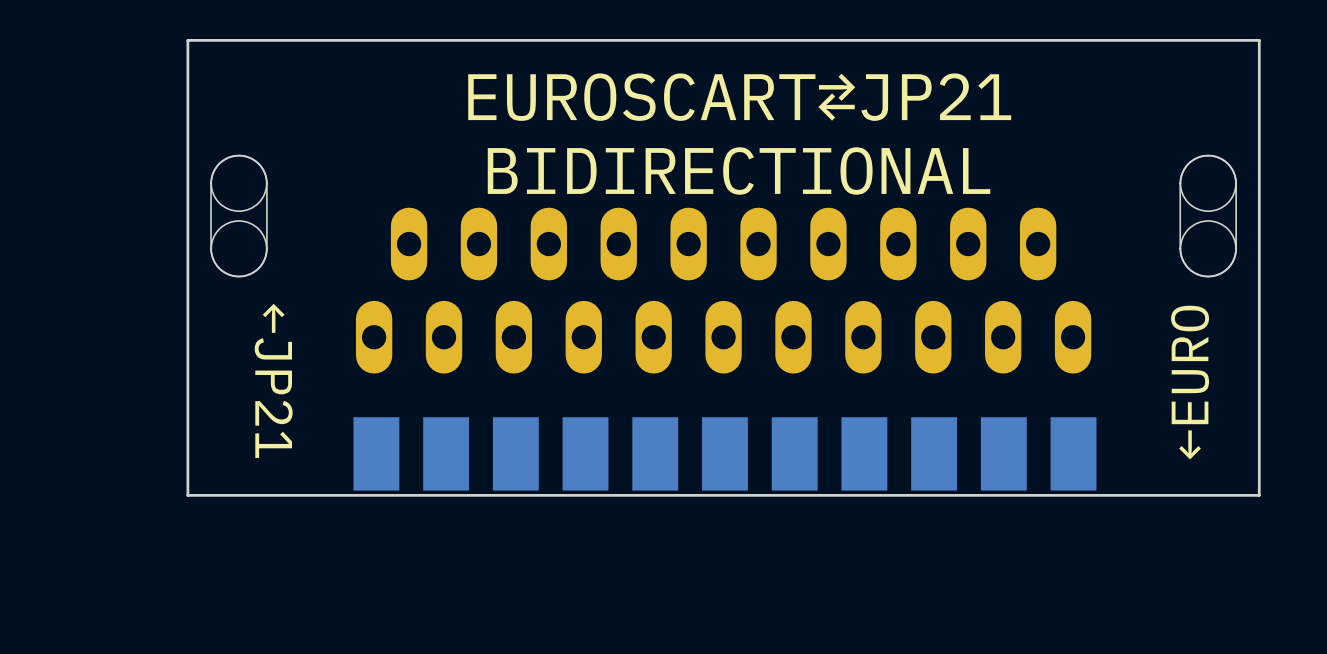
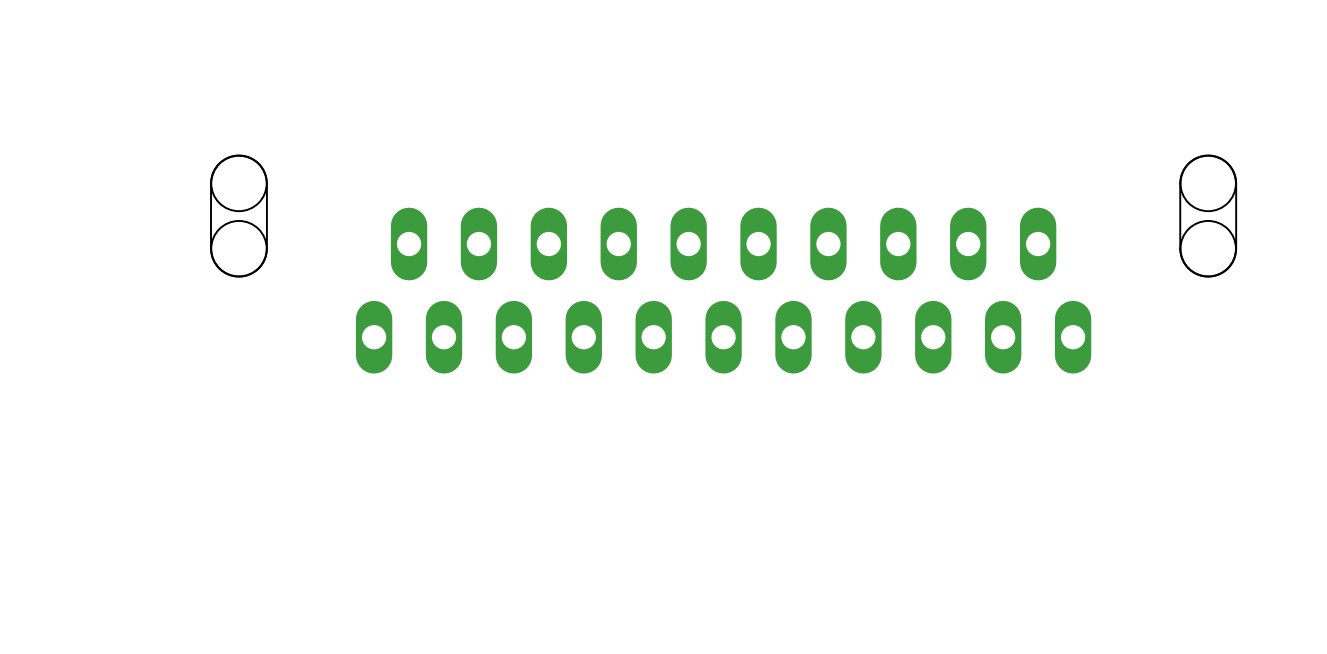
board edge: (1259, 40) (187, 40) (187, 495) (1259, 495) (1259, 40) -> none
text: EUROSCART⇄JP21 (739, 97) -> none
text: BIDIRECTIONAL (739, 170) -> none
text: ←JP21 (273, 380) -> none
text: ←EURO (1190, 382) -> none
part: (724, 453) -> none

